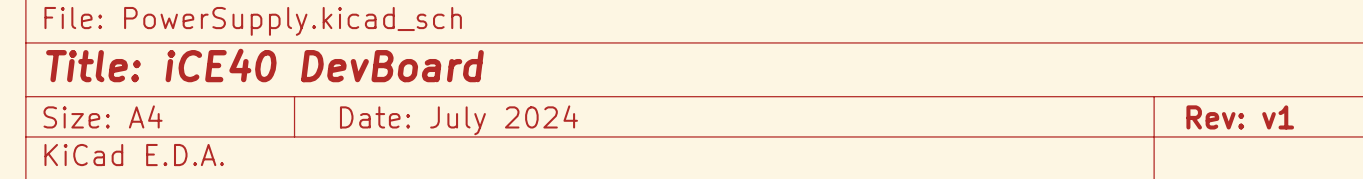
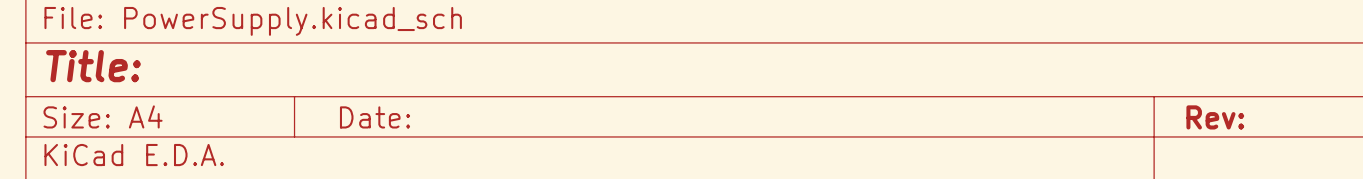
title block: Title: iCE40 DevBoard (264, 65) -> Title: (93, 66)
title block: Rev: v1 (1240, 117) -> Rev: (1215, 117)
title block: Date: July 2024 (458, 120) -> Date: (375, 117)

